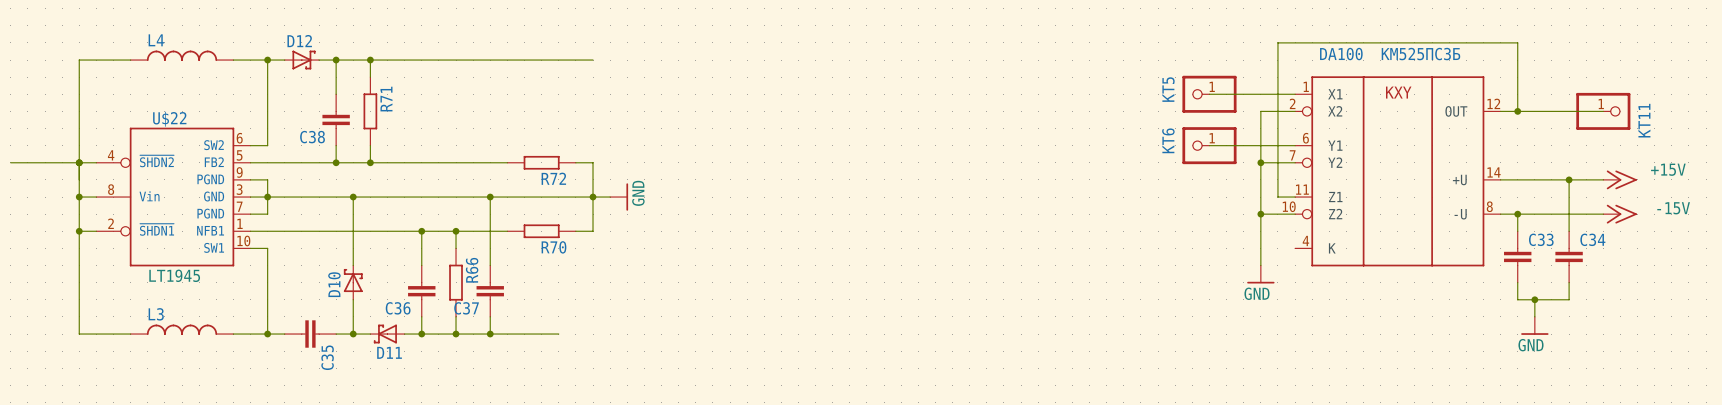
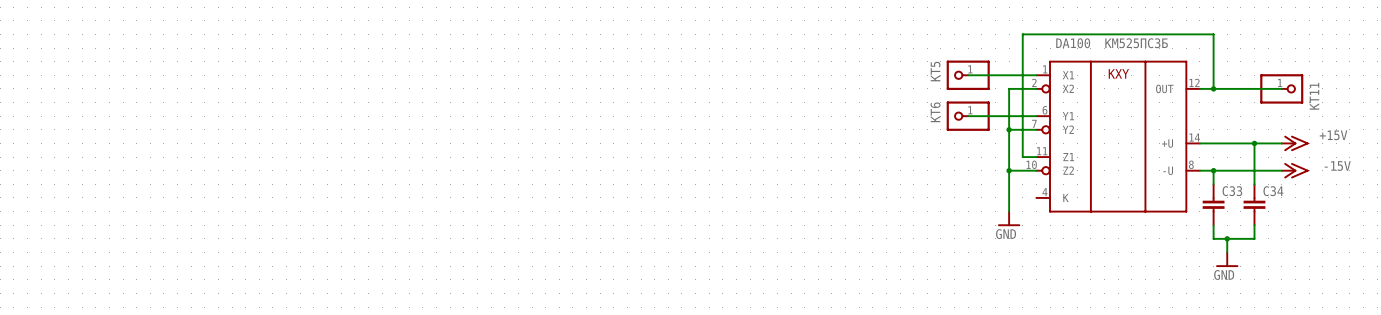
L4: (182, 55) -> none
wire: (130, 60) (79, 60) (79, 334) (130, 334) -> none
wire: (233, 60) (284, 60) -> none
wire: (267, 60) (267, 145) (250, 145) -> none
junction: (267, 60) -> none
D12: (301, 60) -> none
wire: (319, 60) (593, 60) -> none
wire: (336, 60) (336, 94) -> none
junction: (336, 60) -> none
wire: (370, 60) (370, 77) -> none
junction: (370, 60) -> none
R71: (370, 111) -> none
C38: (336, 119) -> none
wire: (336, 145) (336, 162) -> none
wire: (370, 145) (370, 162) -> none
wire: (10, 162) (96, 162) -> none
junction: (79, 162) -> none
wire: (250, 162) (507, 162) -> none
junction: (336, 162) -> none
junction: (370, 162) -> none
R72: (541, 162) -> none
wire: (575, 162) (593, 162) (593, 231) (575, 231) -> none
wire: (250, 179) (267, 179) (267, 214) (250, 214) -> none
wire: (79, 197) (96, 197) -> none
junction: (79, 197) -> none
U$22: LT1945 (173, 197) -> none
wire: (250, 197) (610, 197) -> none
junction: (267, 197) -> none
wire: (353, 197) (353, 265) -> none
junction: (353, 197) -> none
wire: (490, 197) (490, 265) -> none
junction: (490, 197) -> none
junction: (593, 197) -> none
power symbol: GND (619, 197) -> none
wire: (79, 231) (96, 231) -> none
junction: (79, 231) -> none
wire: (250, 231) (507, 231) -> none
wire: (421, 231) (421, 265) -> none
junction: (421, 231) -> none
wire: (456, 231) (456, 248) -> none
junction: (456, 231) -> none
R70: (541, 231) -> none
wire: (250, 248) (267, 248) (267, 334) -> none
D10: (353, 282) -> none
R66: (456, 282) -> none
C36: (421, 291) -> none
C37: (490, 291) -> none
wire: (353, 299) (353, 334) -> none
wire: (421, 316) (421, 334) -> none
wire: (456, 316) (456, 334) -> none
wire: (490, 316) (490, 334) -> none
L3: (182, 329) -> none
wire: (233, 334) (284, 334) -> none
junction: (267, 334) -> none
C35: (310, 334) -> none
wire: (336, 334) (370, 334) -> none
junction: (353, 334) -> none
D11: (387, 334) -> none
wire: (404, 334) (558, 334) -> none
junction: (421, 334) -> none
junction: (456, 334) -> none
junction: (490, 334) -> none

